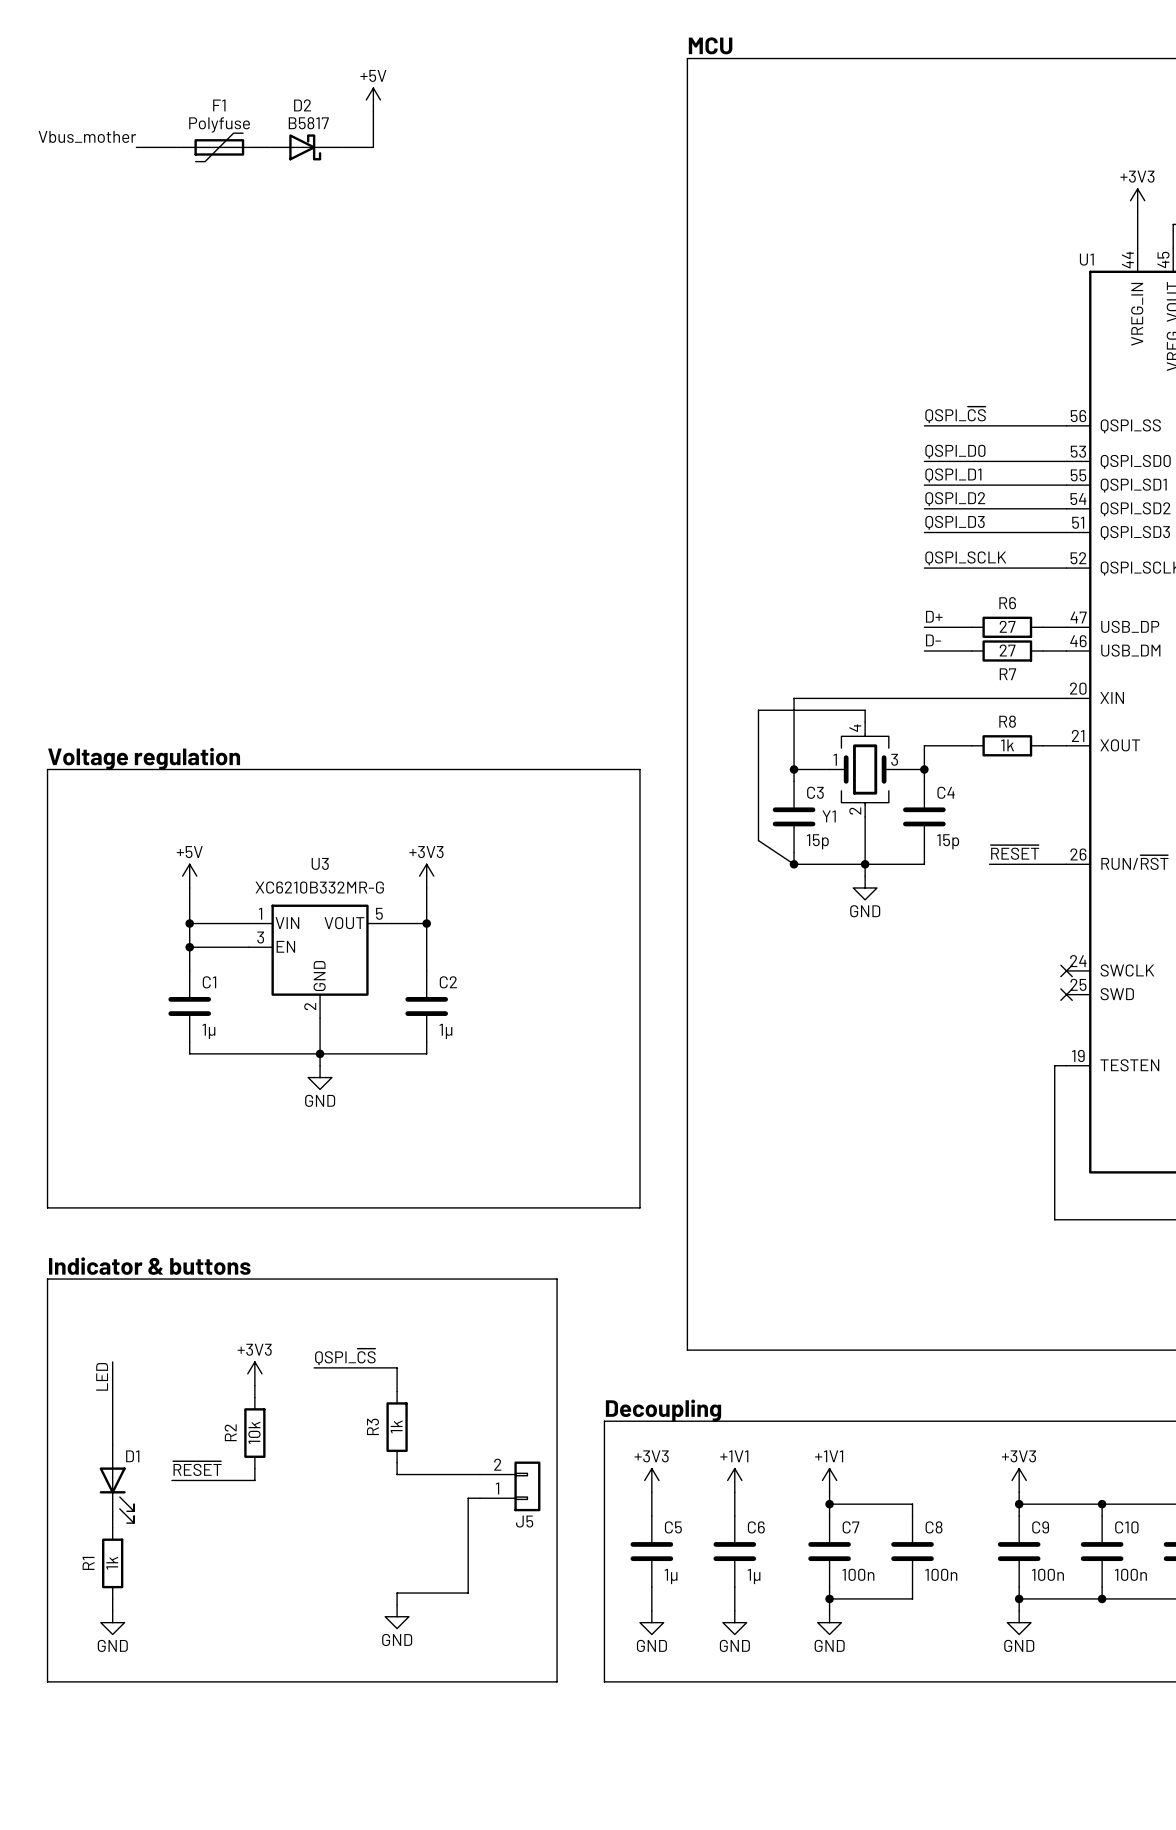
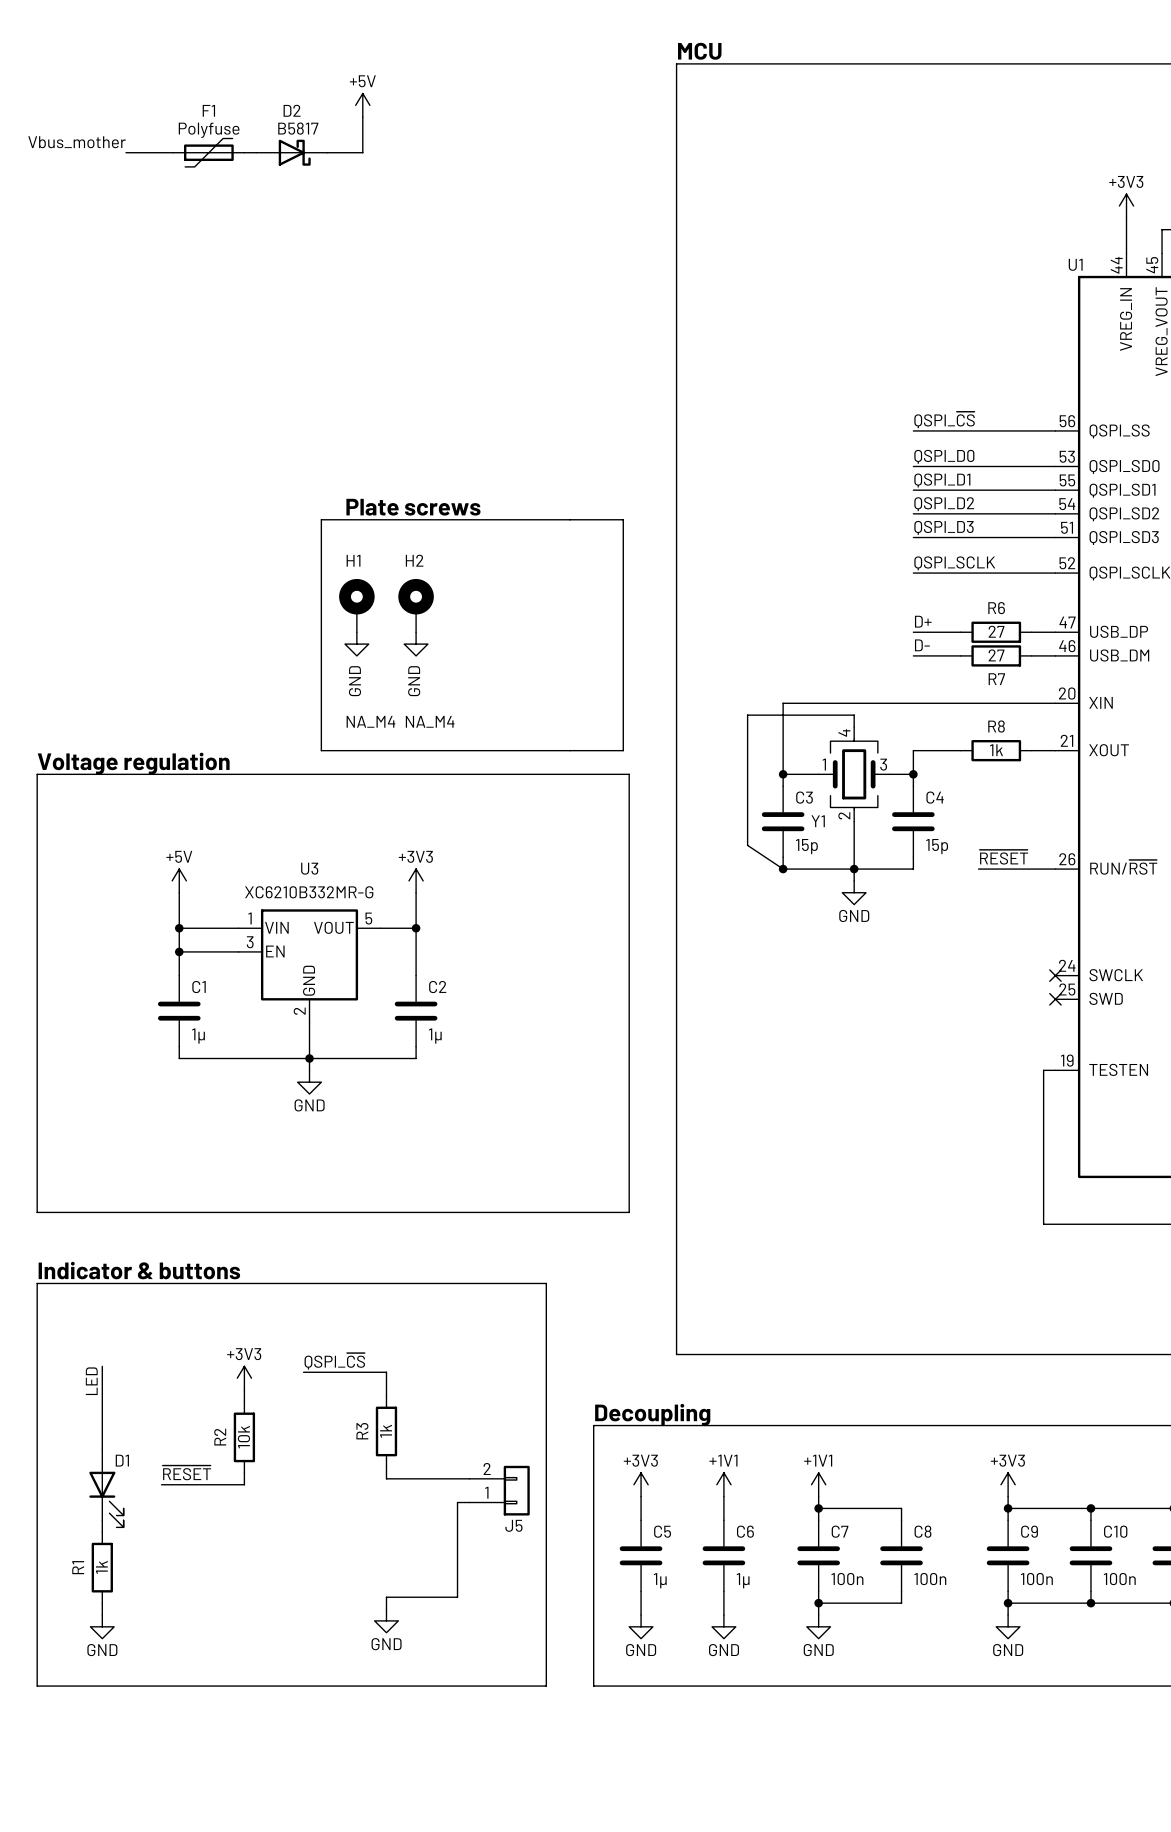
text: none -> Plate screws (413, 507)
line: none -> (321, 519) (321, 750) (623, 750) (623, 519) (321, 519)
H1: none -> NA_M4 (356, 605)
H2: none -> NA_M4 (416, 605)
power symbol: none -> GND (356, 644)
power symbol: none -> GND (416, 644)

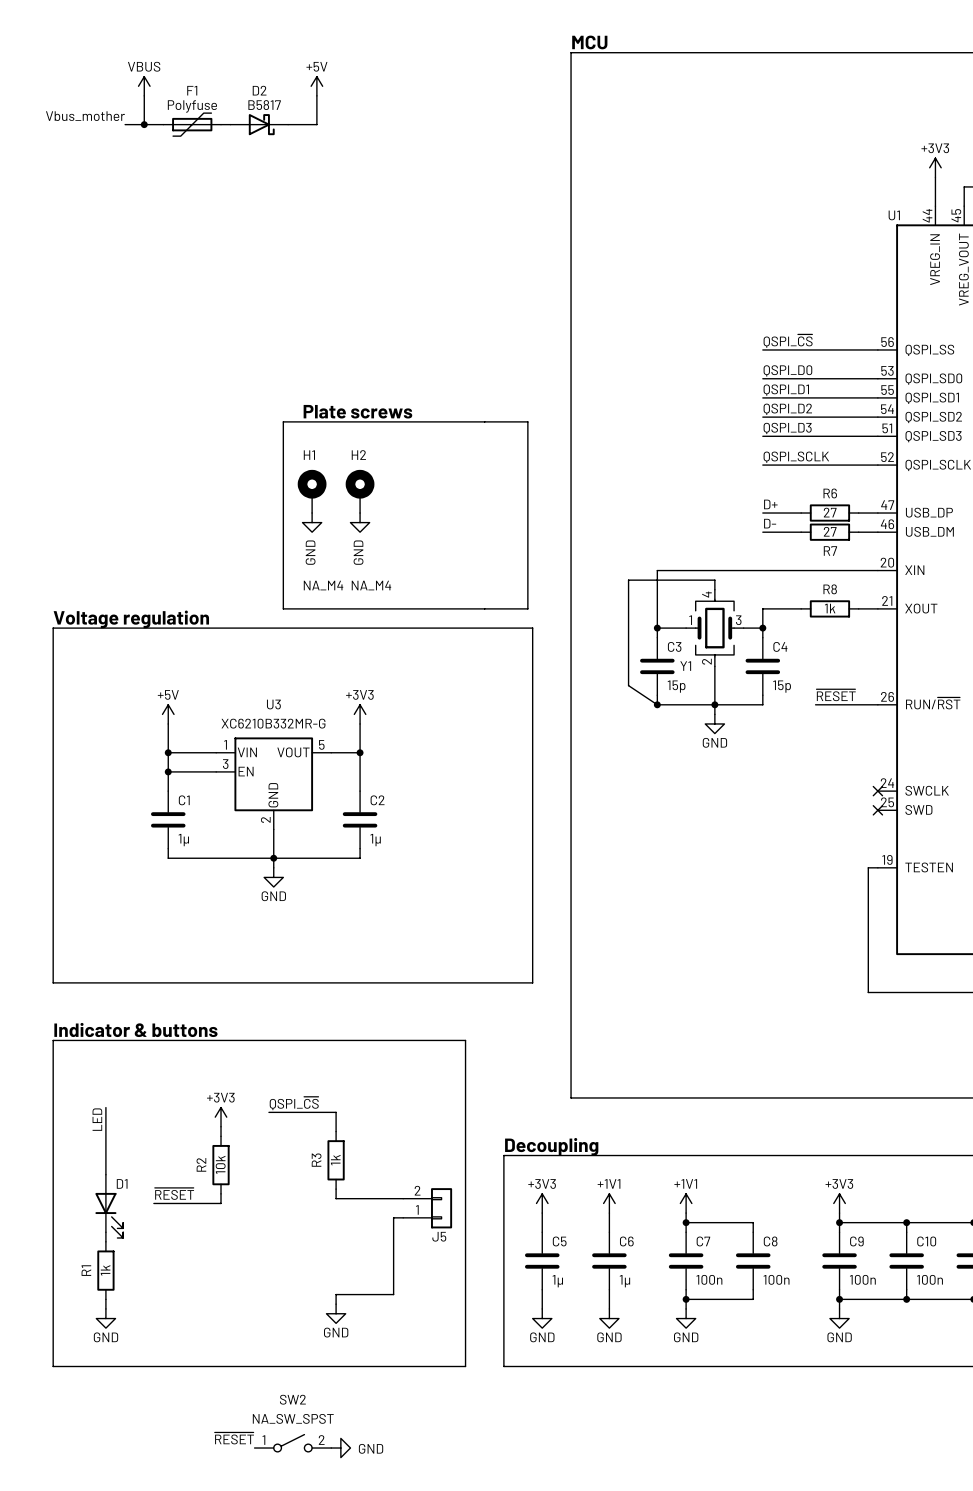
power symbol: none -> VBUS (144, 86)
wire: none -> (144, 95) (144, 124)
junction: none -> (144, 124)
label: none -> ~{RESET} (234, 1438)
SW2: none -> NA_SW_SPST (292, 1443)
power symbol: none -> GND (340, 1448)

